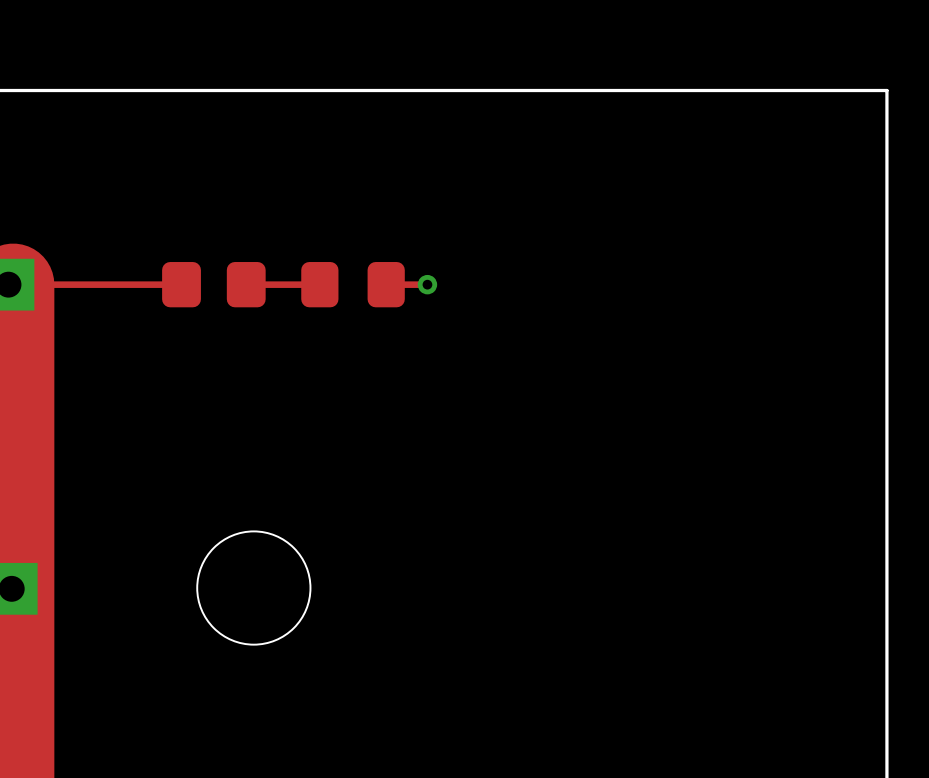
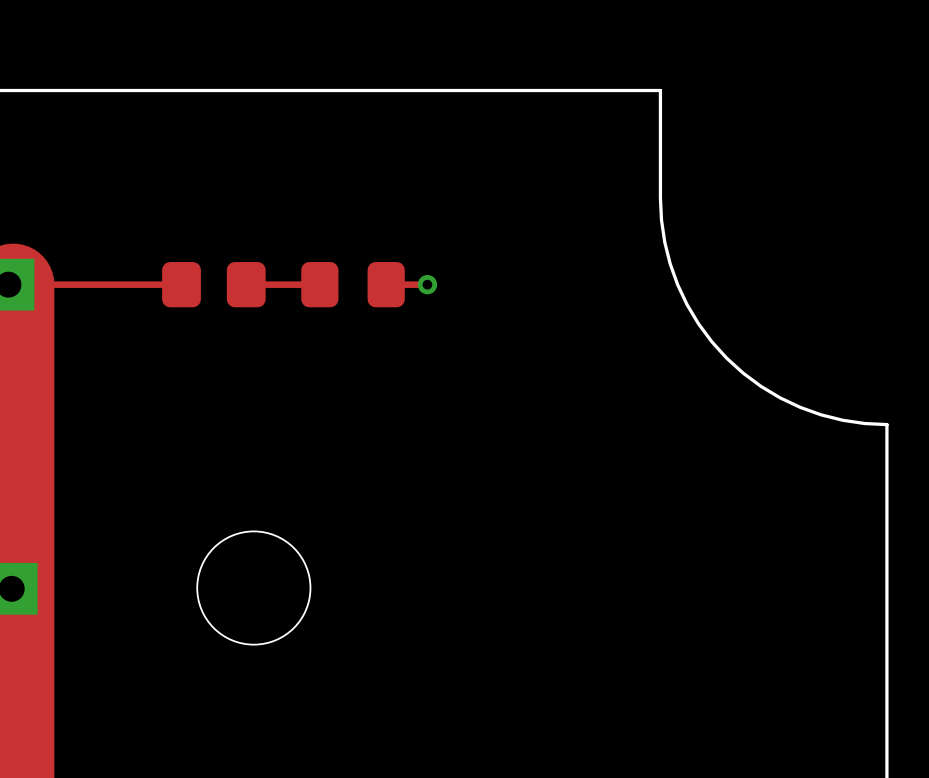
board edge: (660, 90) (886, 90) (886, 424) -> (660, 90) (660, 198) (664, 242) (677, 284) (698, 323) (711, 341) (743, 373) (780, 397) (800, 407) (842, 420) (886, 424)

